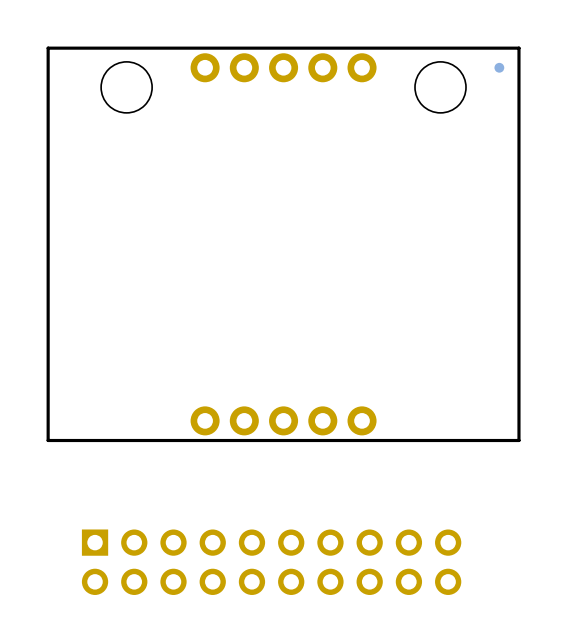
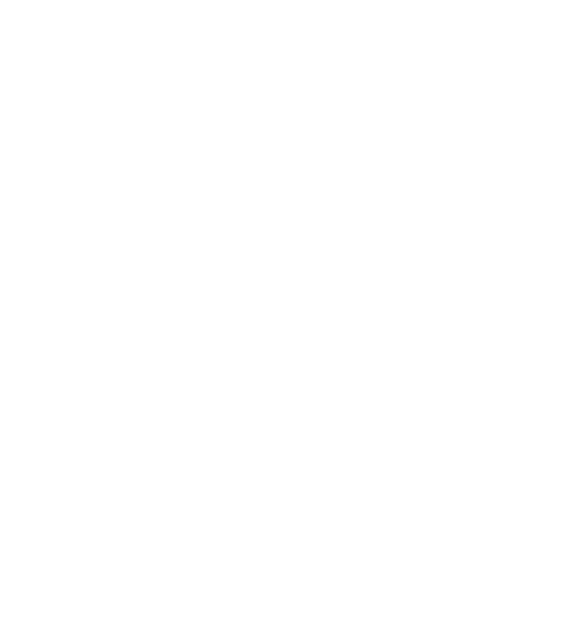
part: (283, 244) -> none
part: (271, 562) -> none

